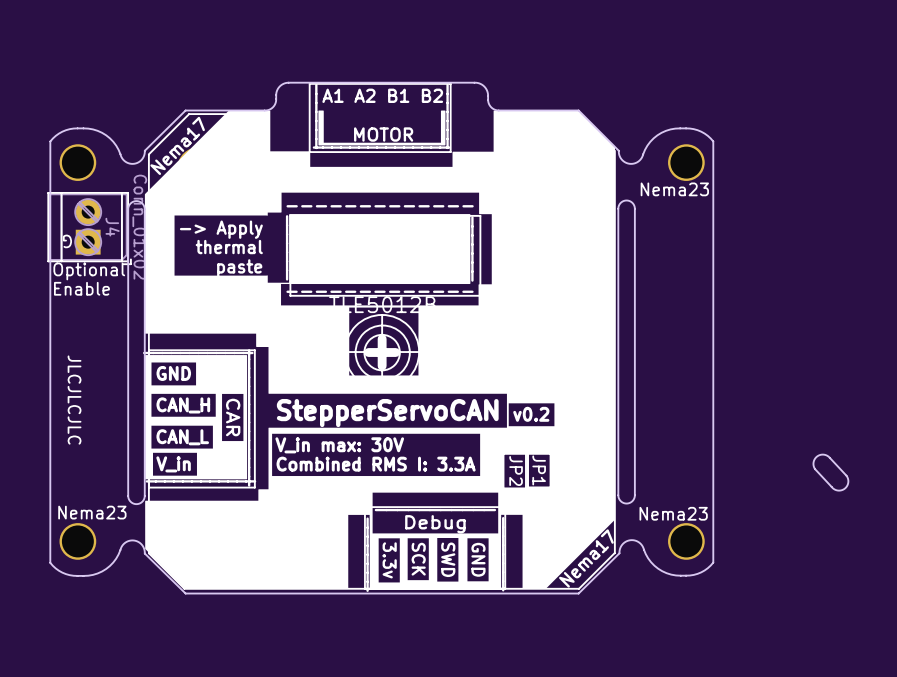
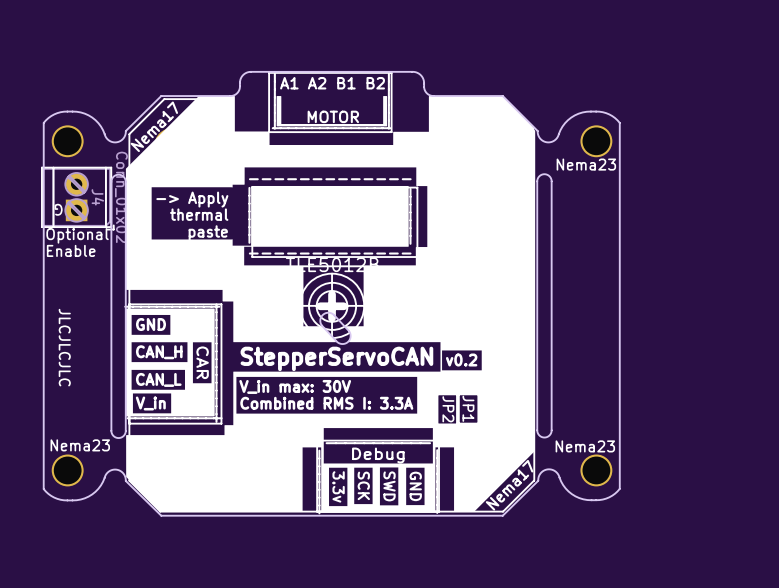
drawing shape: [144, 110, 615, 590] -> [125, 96, 535, 512]
board edge: none -> (334, 315) (349, 332) (350, 338) (345, 343) (337, 342) (320, 323) (320, 318) (324, 313) (330, 312) (334, 315)
board edge: (829, 457) (847, 477) (847, 485) (842, 489) (833, 488) (814, 467) (813, 461) (818, 455) (823, 454) (829, 457) -> none

